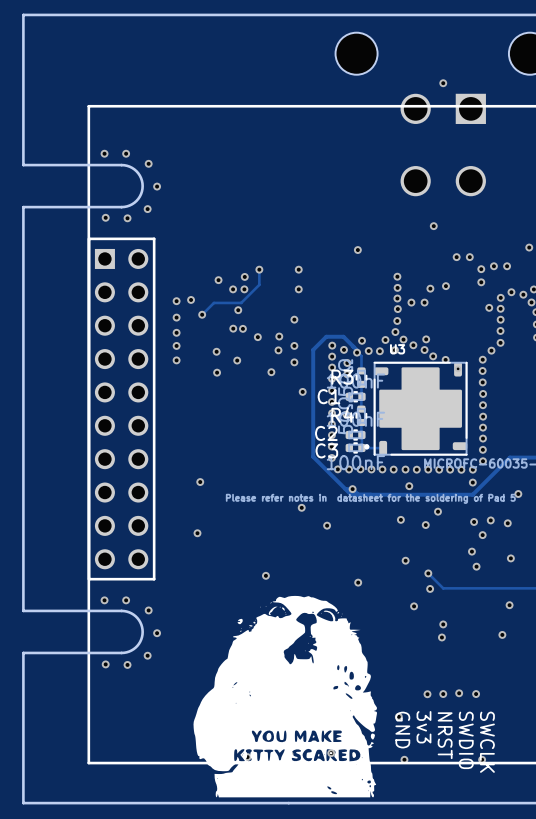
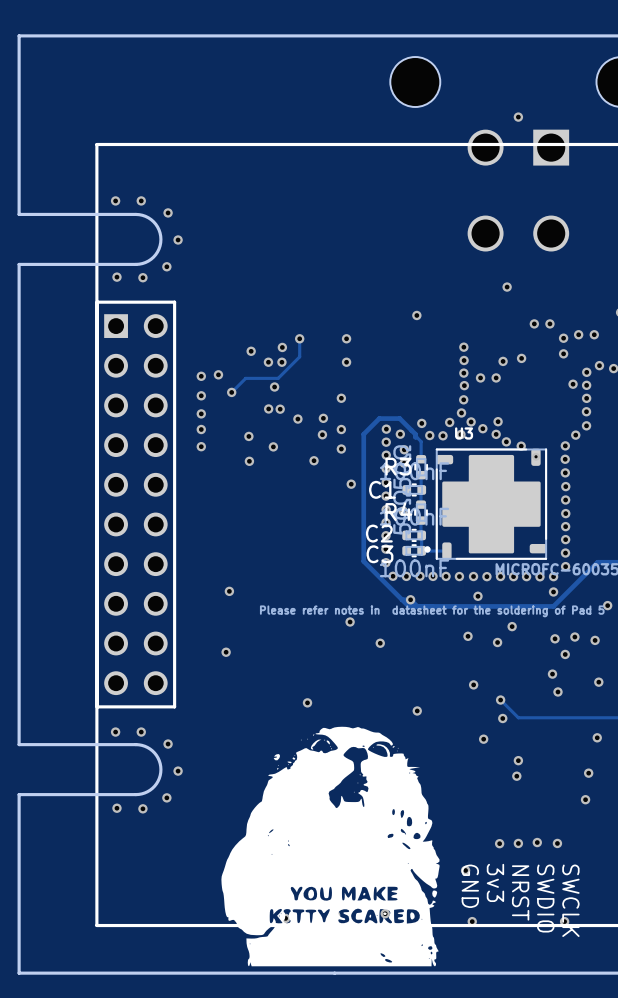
via: (357, 352) -> none
via: none -> (585, 799)

